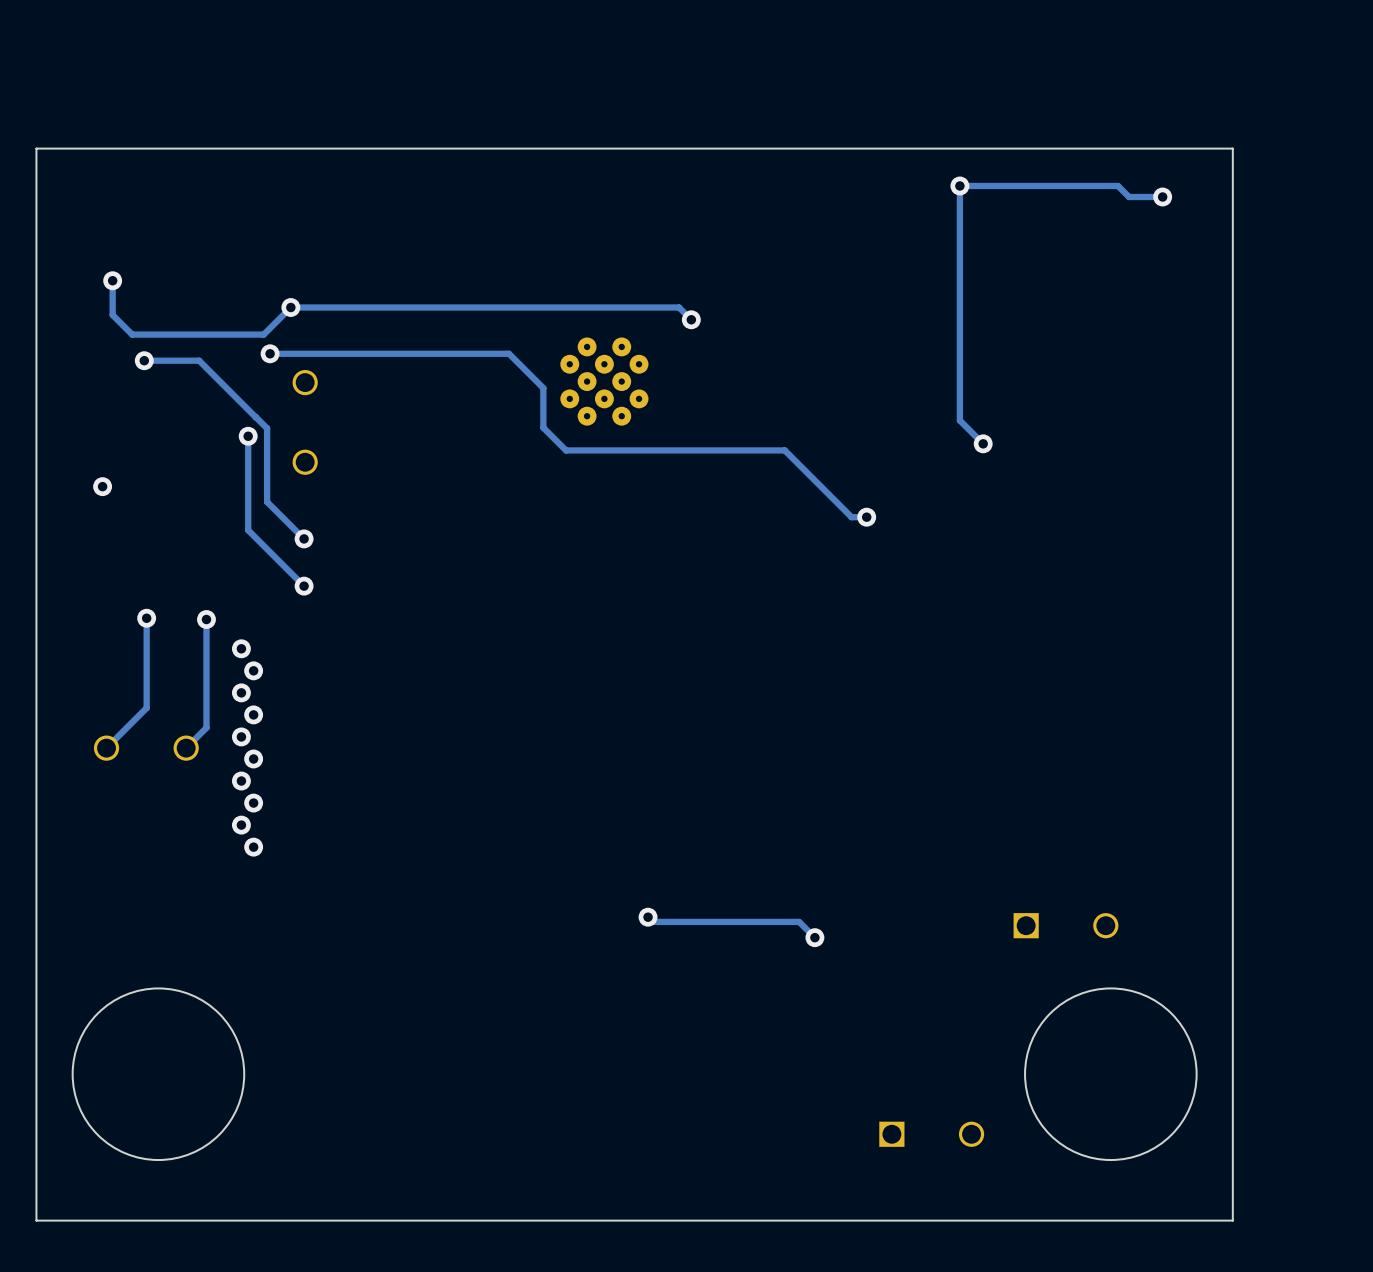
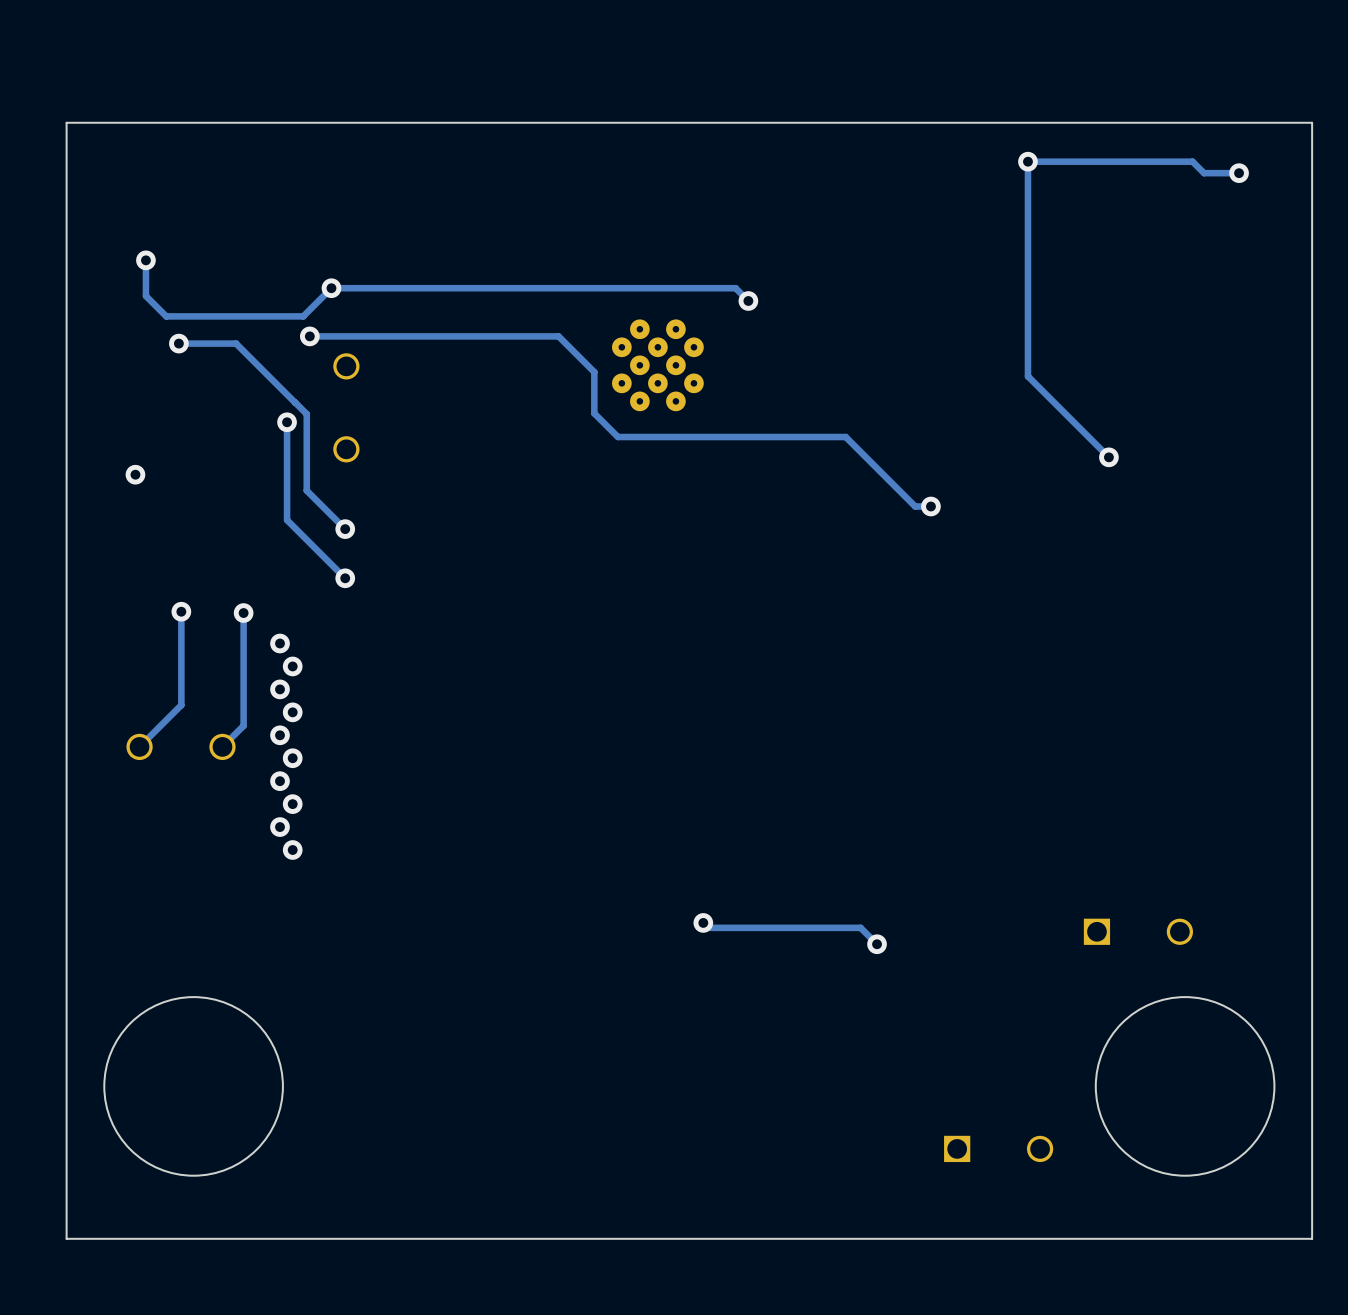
track: (959, 392) (959, 420) (983, 443) -> (1027, 376) (1108, 457)
via position: (983, 443) -> (1108, 457)

